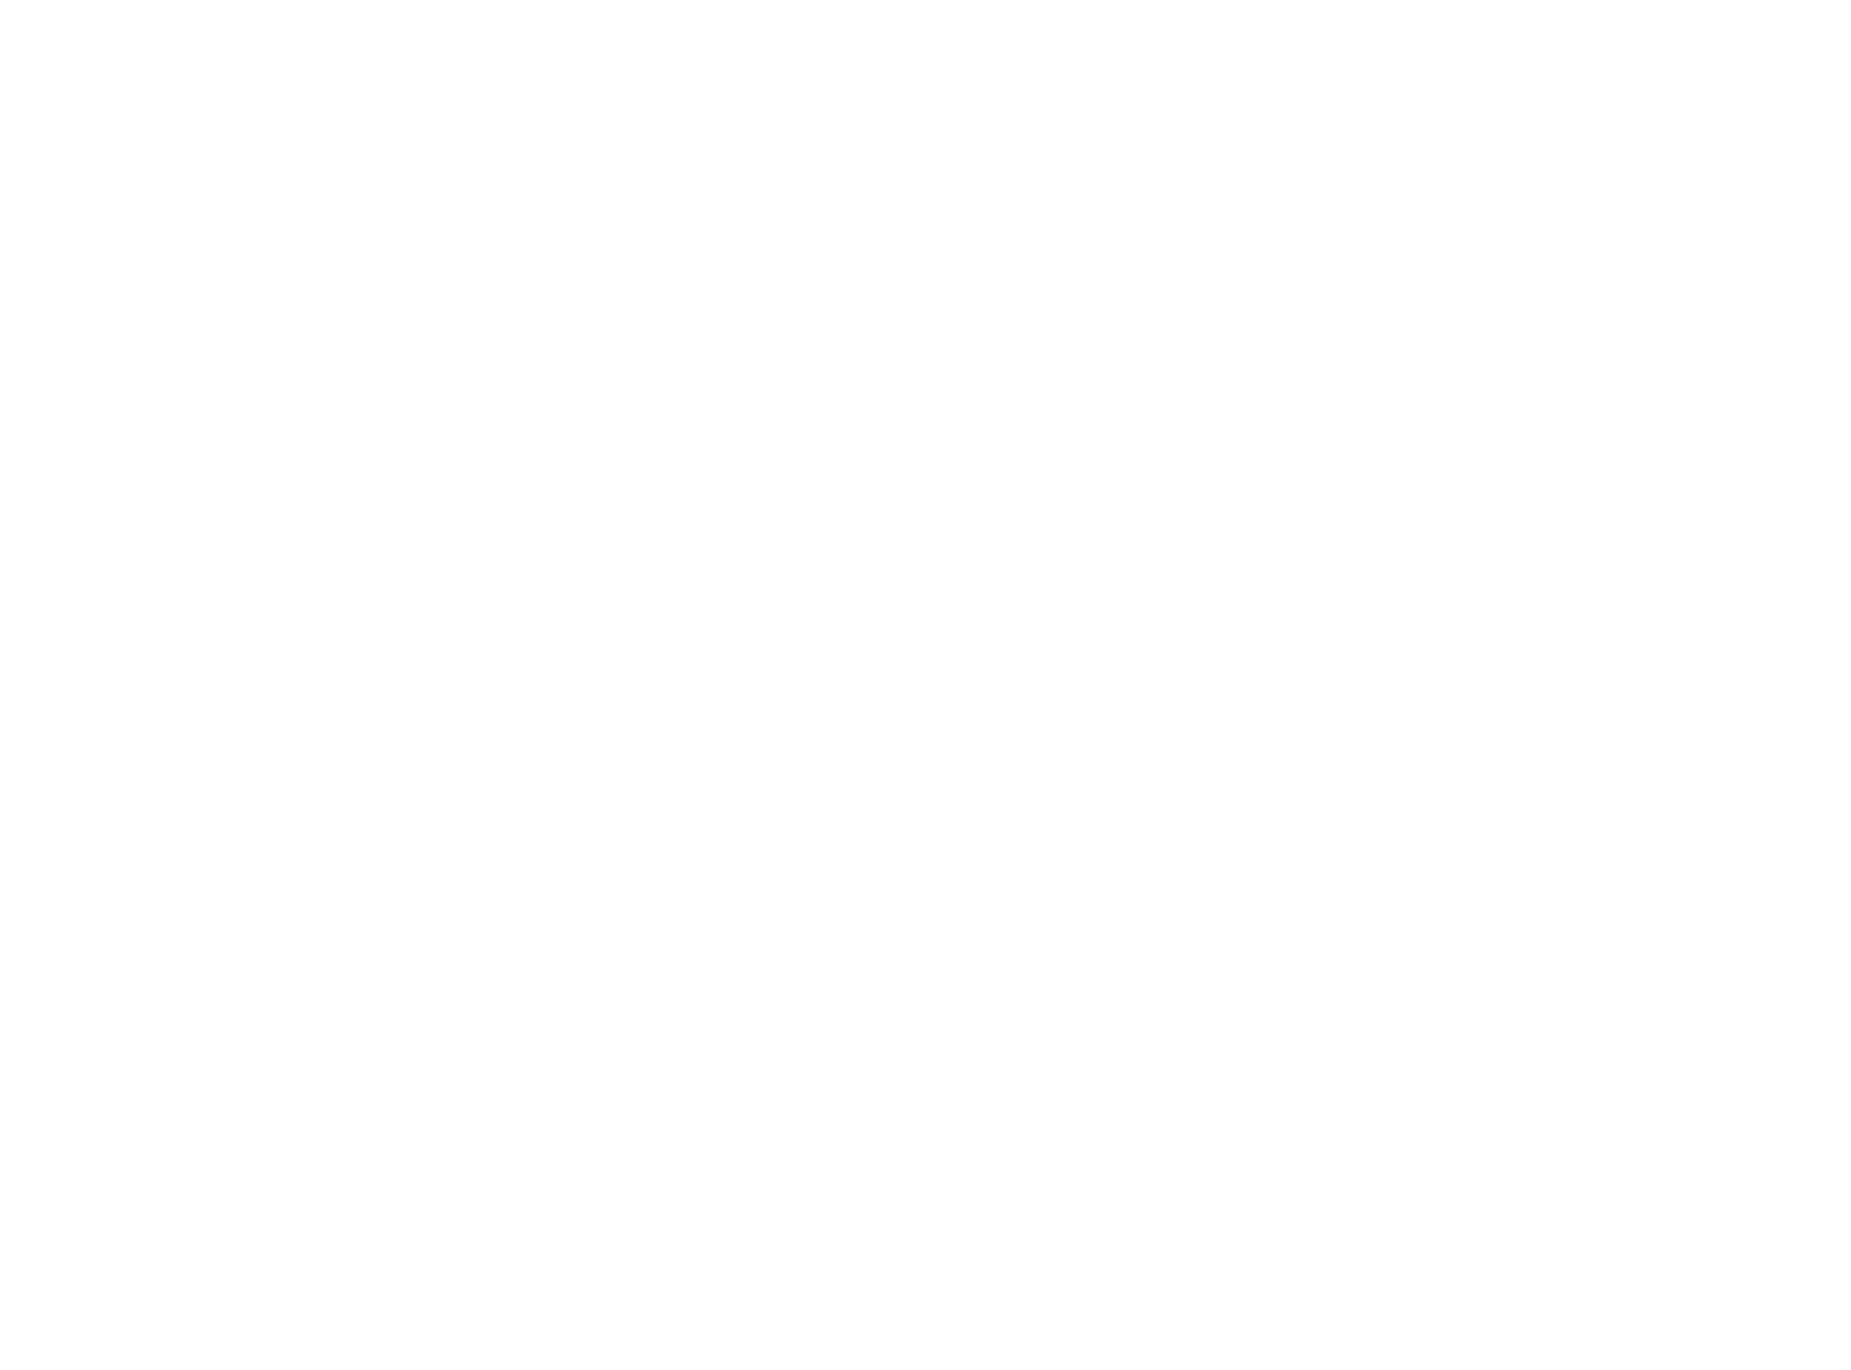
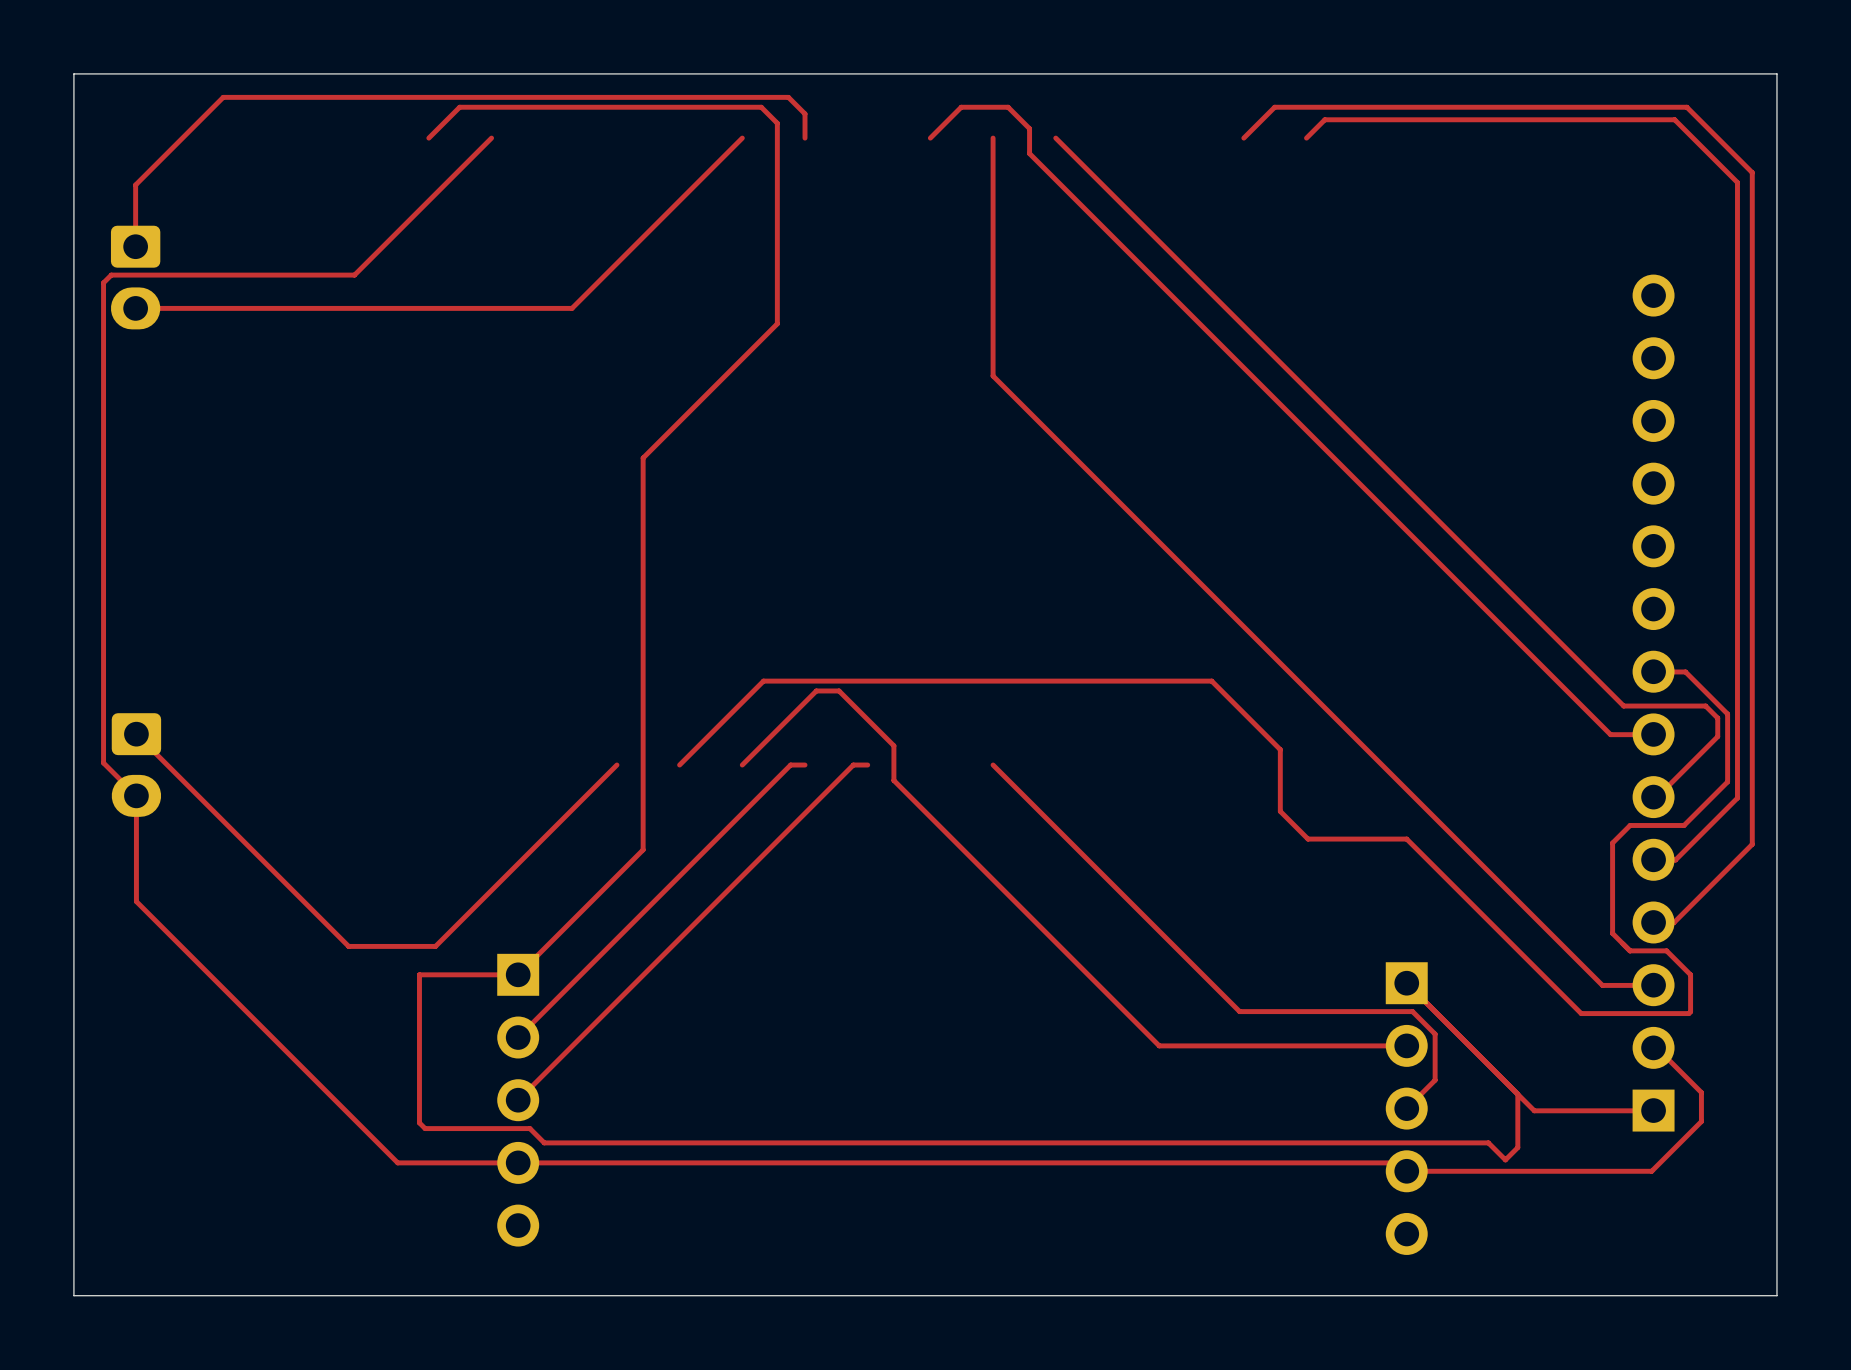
board edge: none -> (1776, 73) (73, 73) (73, 1295) (1776, 1295) (1776, 73)
top track: none -> (428, 138) (459, 107) (761, 107) (777, 123) (777, 323) (643, 458) (643, 849) (518, 974) (419, 974) (419, 1122) (425, 1128) (529, 1128) (544, 1142) (1488, 1142) (1505, 1159) (1517, 1147) (1517, 1094)
top track: none -> (491, 138) (354, 275) (111, 275) (103, 282) (103, 762) (136, 795) (136, 901) (397, 1162) (1398, 1162) (1406, 1171) (1651, 1171) (1701, 1121) (1701, 1092) (1657, 1048)
top track: none -> (742, 138) (572, 308) (135, 308)
top track: none -> (805, 138) (805, 113) (788, 97) (223, 97) (135, 184) (135, 246)
top track: none -> (930, 138) (961, 107) (1008, 107) (1029, 128) (1029, 153) (1610, 734) (1657, 734)
top track: none -> (993, 138) (993, 376) (1602, 985) (1657, 985)
top track: none -> (1055, 138) (1623, 706) (1705, 706) (1717, 718) (1717, 736) (1657, 797)
top track: none -> (1243, 138) (1274, 107) (1686, 107) (1752, 172) (1752, 844) (1673, 922) (1657, 922)
top track: none -> (1306, 138) (1324, 119) (1674, 119) (1737, 182) (1737, 798) (1675, 860) (1657, 860)
part: none -> (135, 277)
top track: none -> (1657, 671) (1685, 671) (1727, 714) (1727, 781) (1684, 825) (1630, 825) (1612, 843) (1612, 933) (1629, 950) (1666, 950) (1690, 974) (1690, 1011) (1688, 1013) (1581, 1013) (1406, 839) (1308, 839) (1280, 811) (1280, 749) (1211, 681) (763, 681) (679, 765)
part: none -> (1653, 703)
top track: none -> (136, 734) (348, 946) (435, 946) (616, 765)
part: none -> (136, 765)
top track: none -> (742, 765) (816, 690) (839, 690) (893, 745) (893, 780) (1159, 1045) (1406, 1045)
top track: none -> (805, 765) (790, 765) (518, 1037)
top track: none -> (867, 765) (853, 765) (518, 1100)
top track: none -> (993, 765) (1239, 1011) (1412, 1011) (1435, 1034) (1435, 1080) (1406, 1108)
top track: none -> (1398, 974) (1534, 1110) (1657, 1110)
part: none -> (518, 1100)
part: none -> (1406, 1108)

